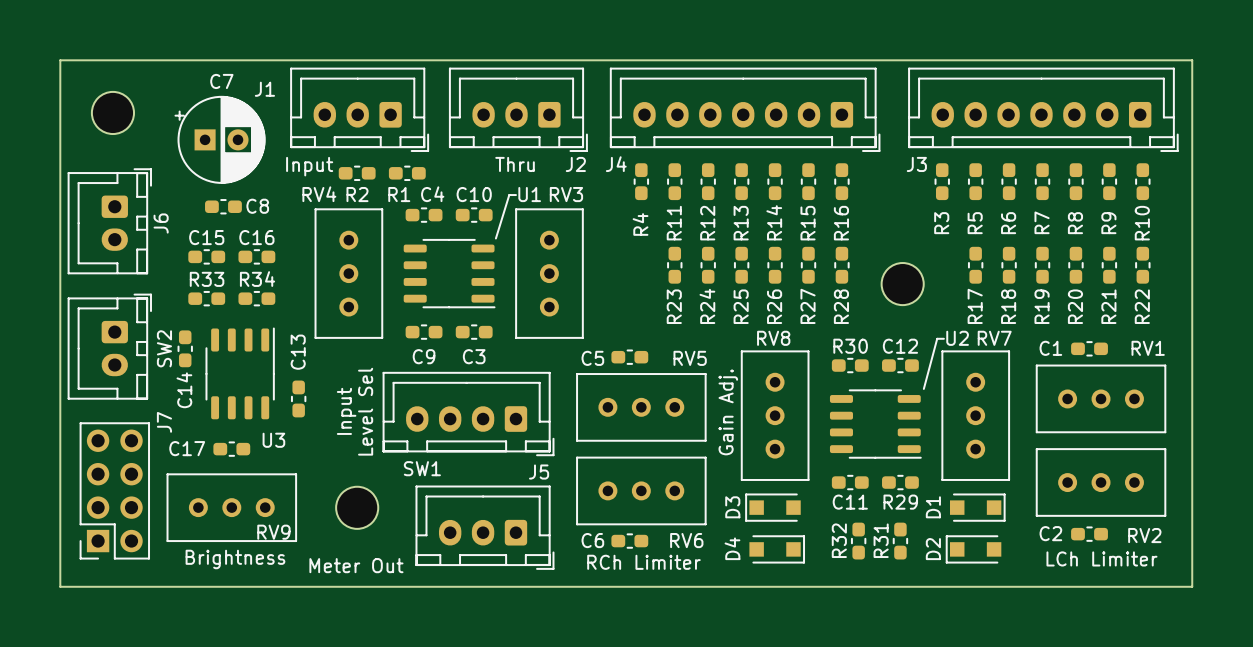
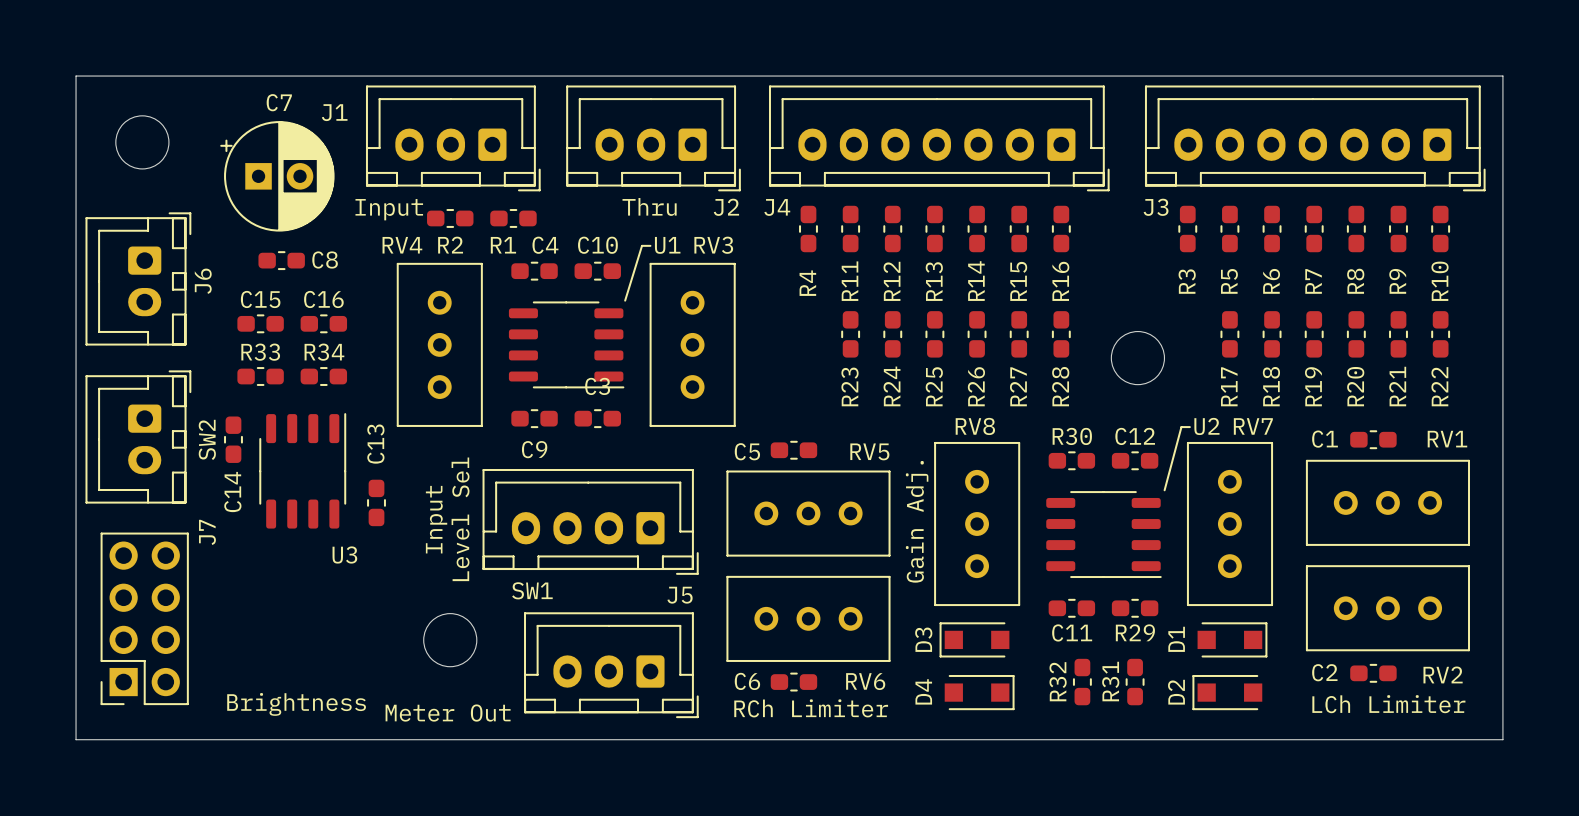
C3 name position: C3 (474, 356) -> C3 (597, 386)
C17: (231, 449) -> none
RV9: (231, 507) -> none

